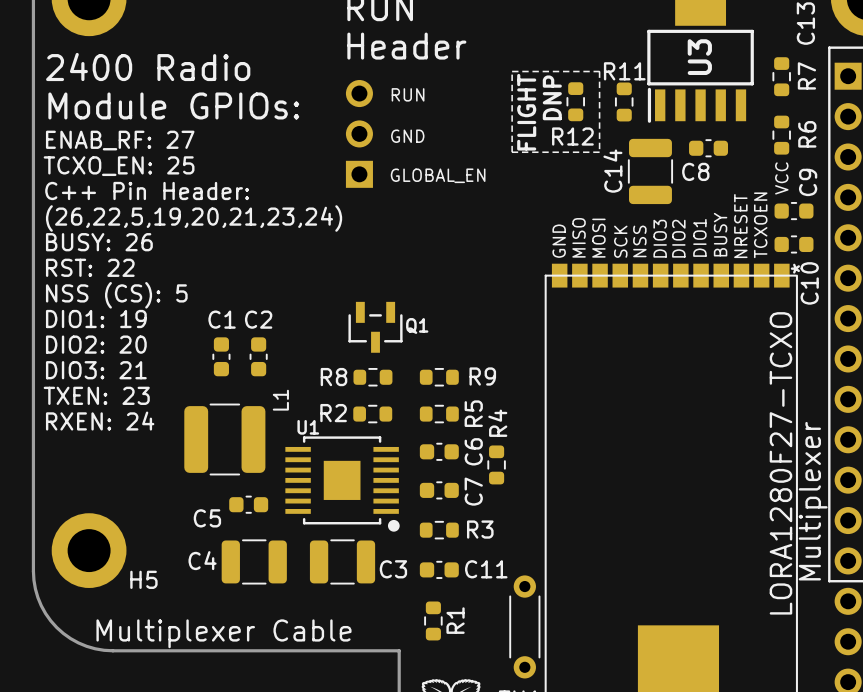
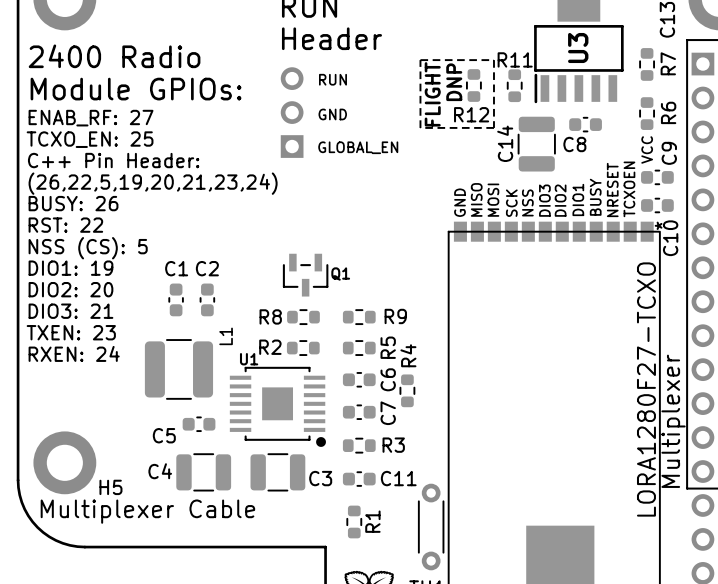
text position: Multiplexer Cable (223, 633) -> Multiplexer Cable (147, 511)

